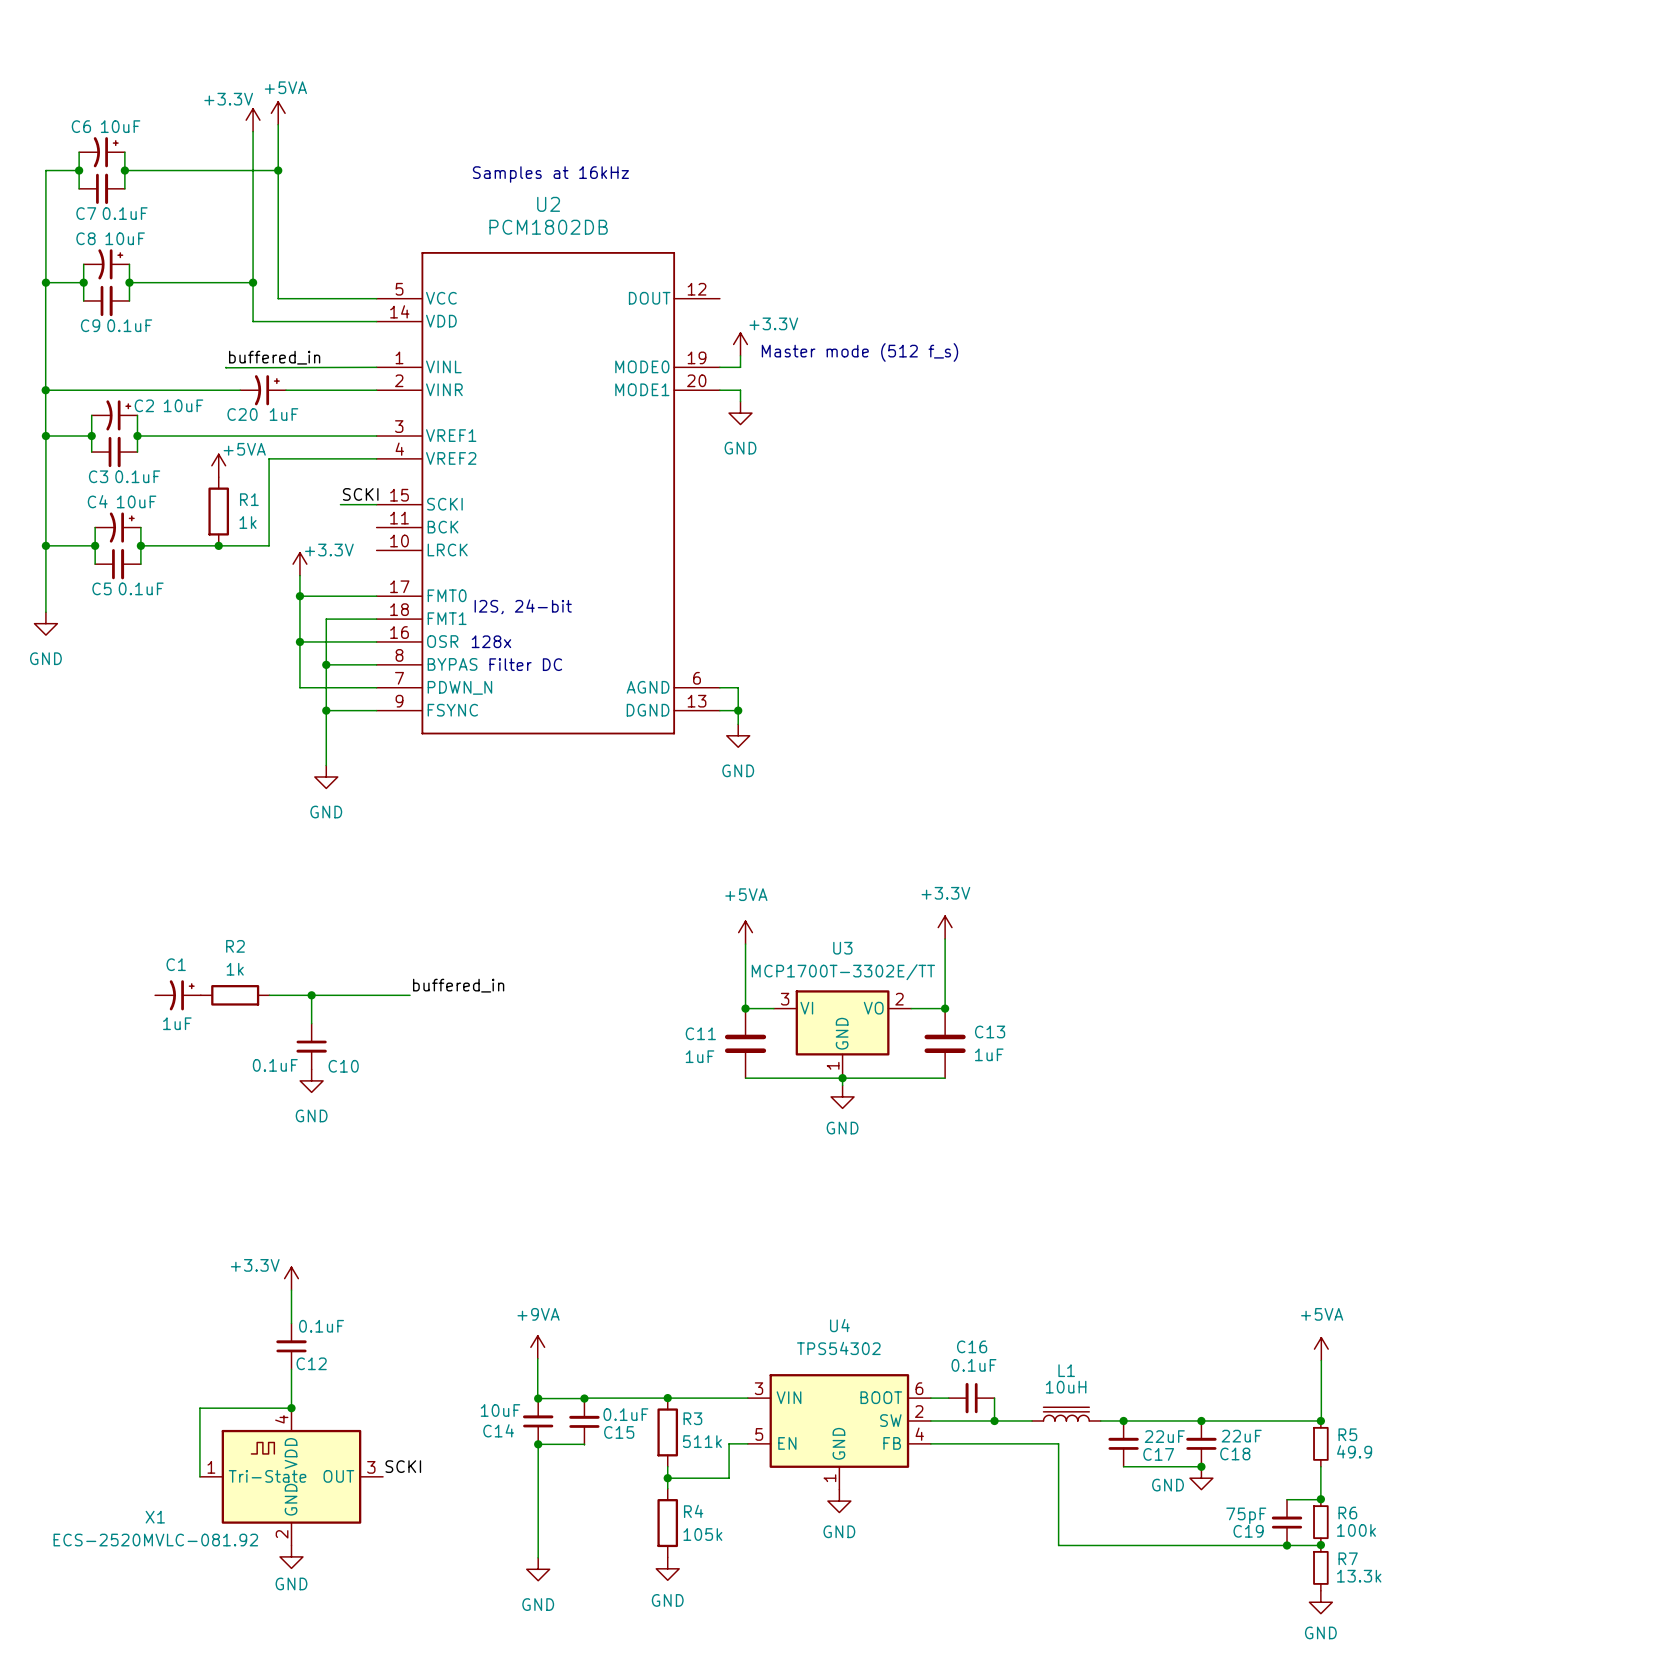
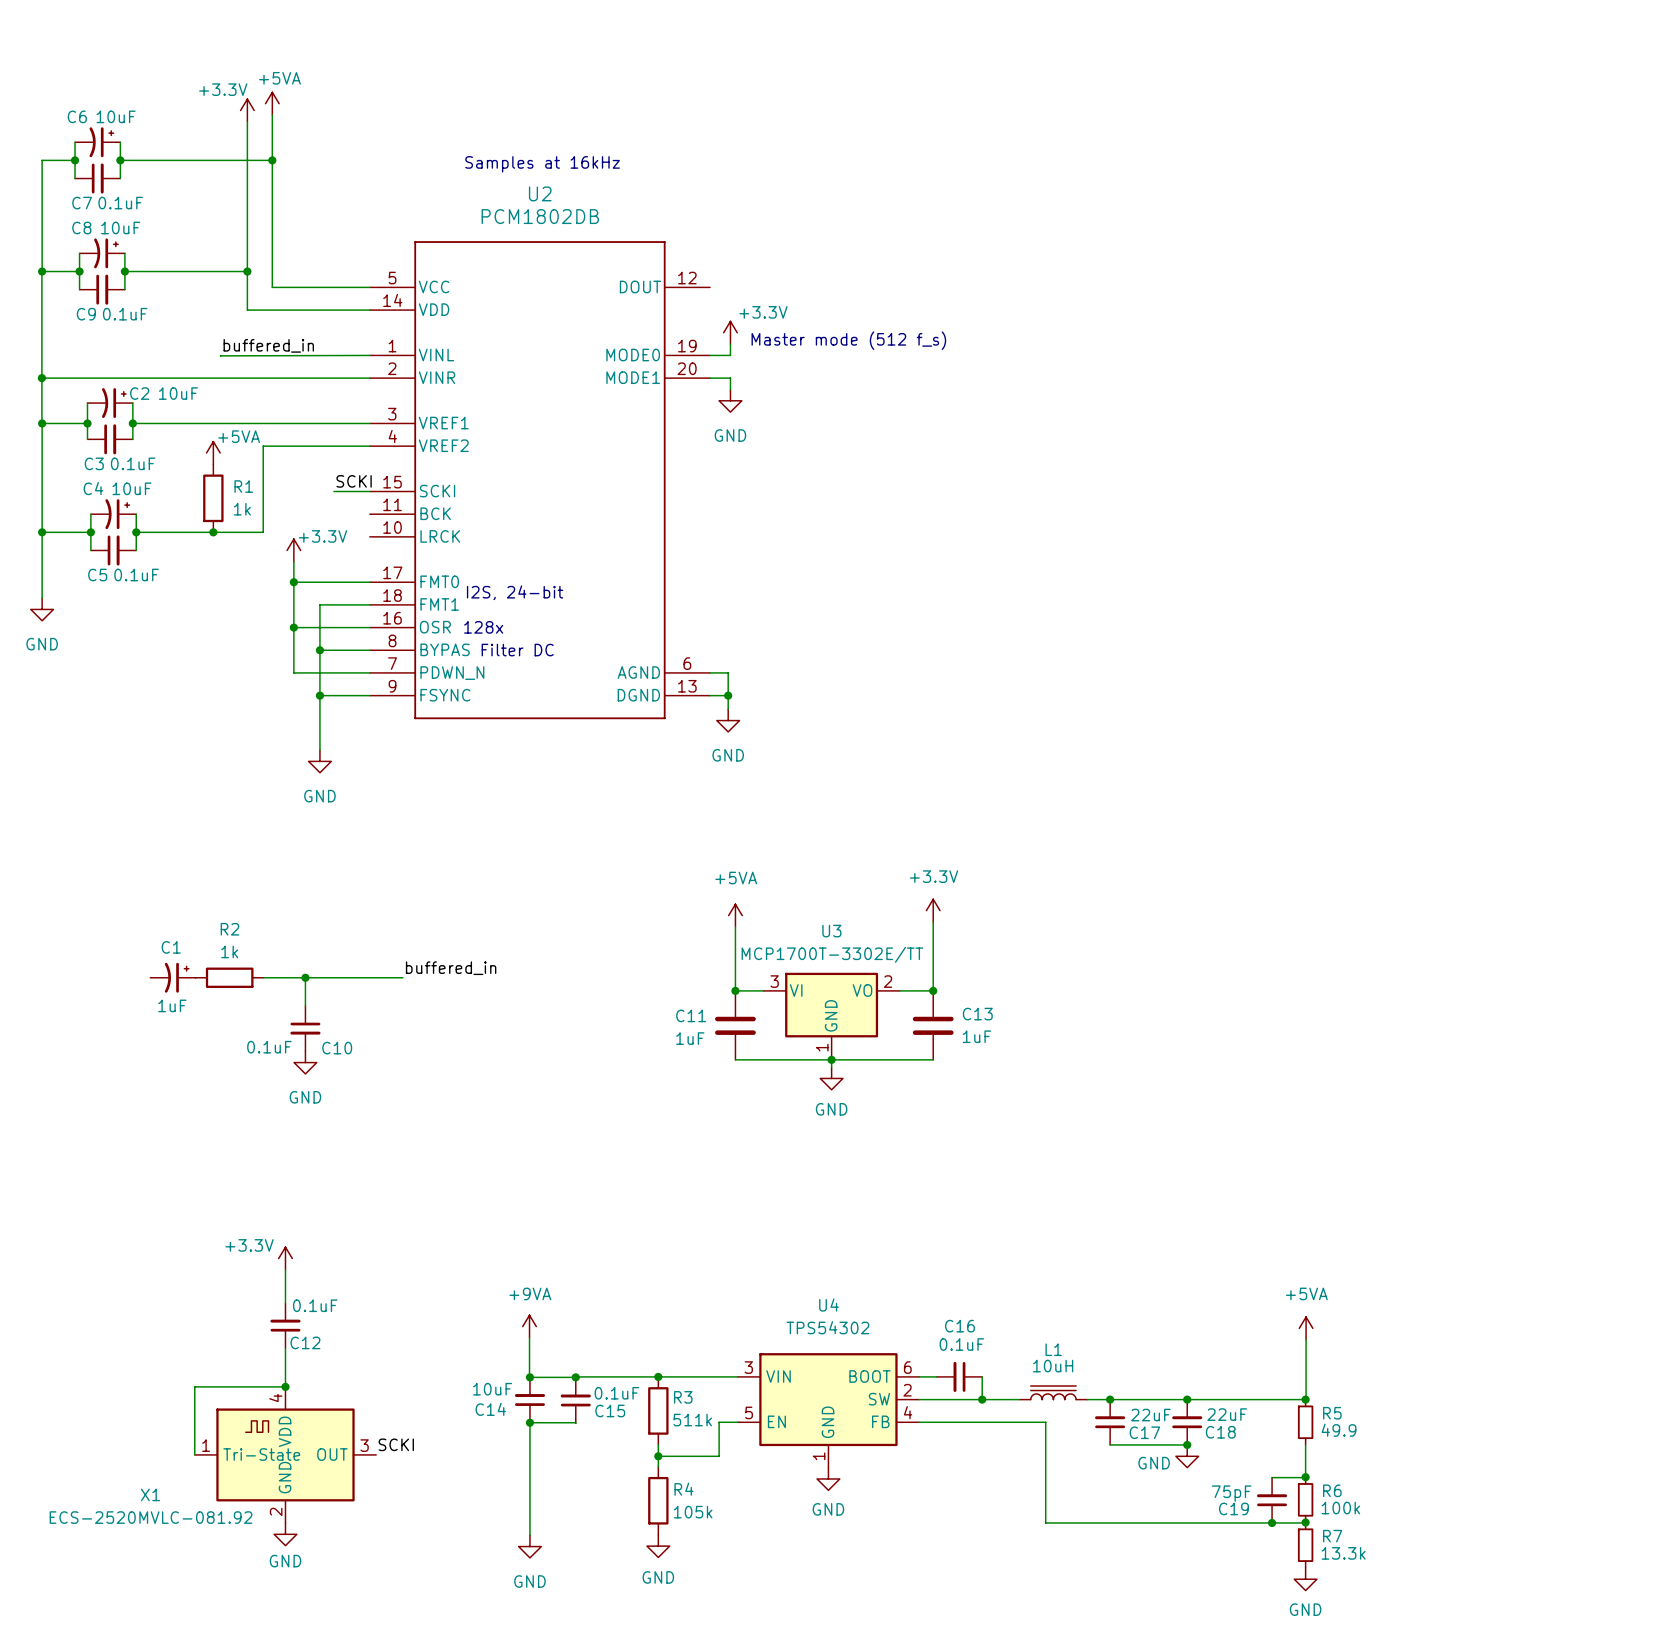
C20: 1uF (263, 390) -> none

